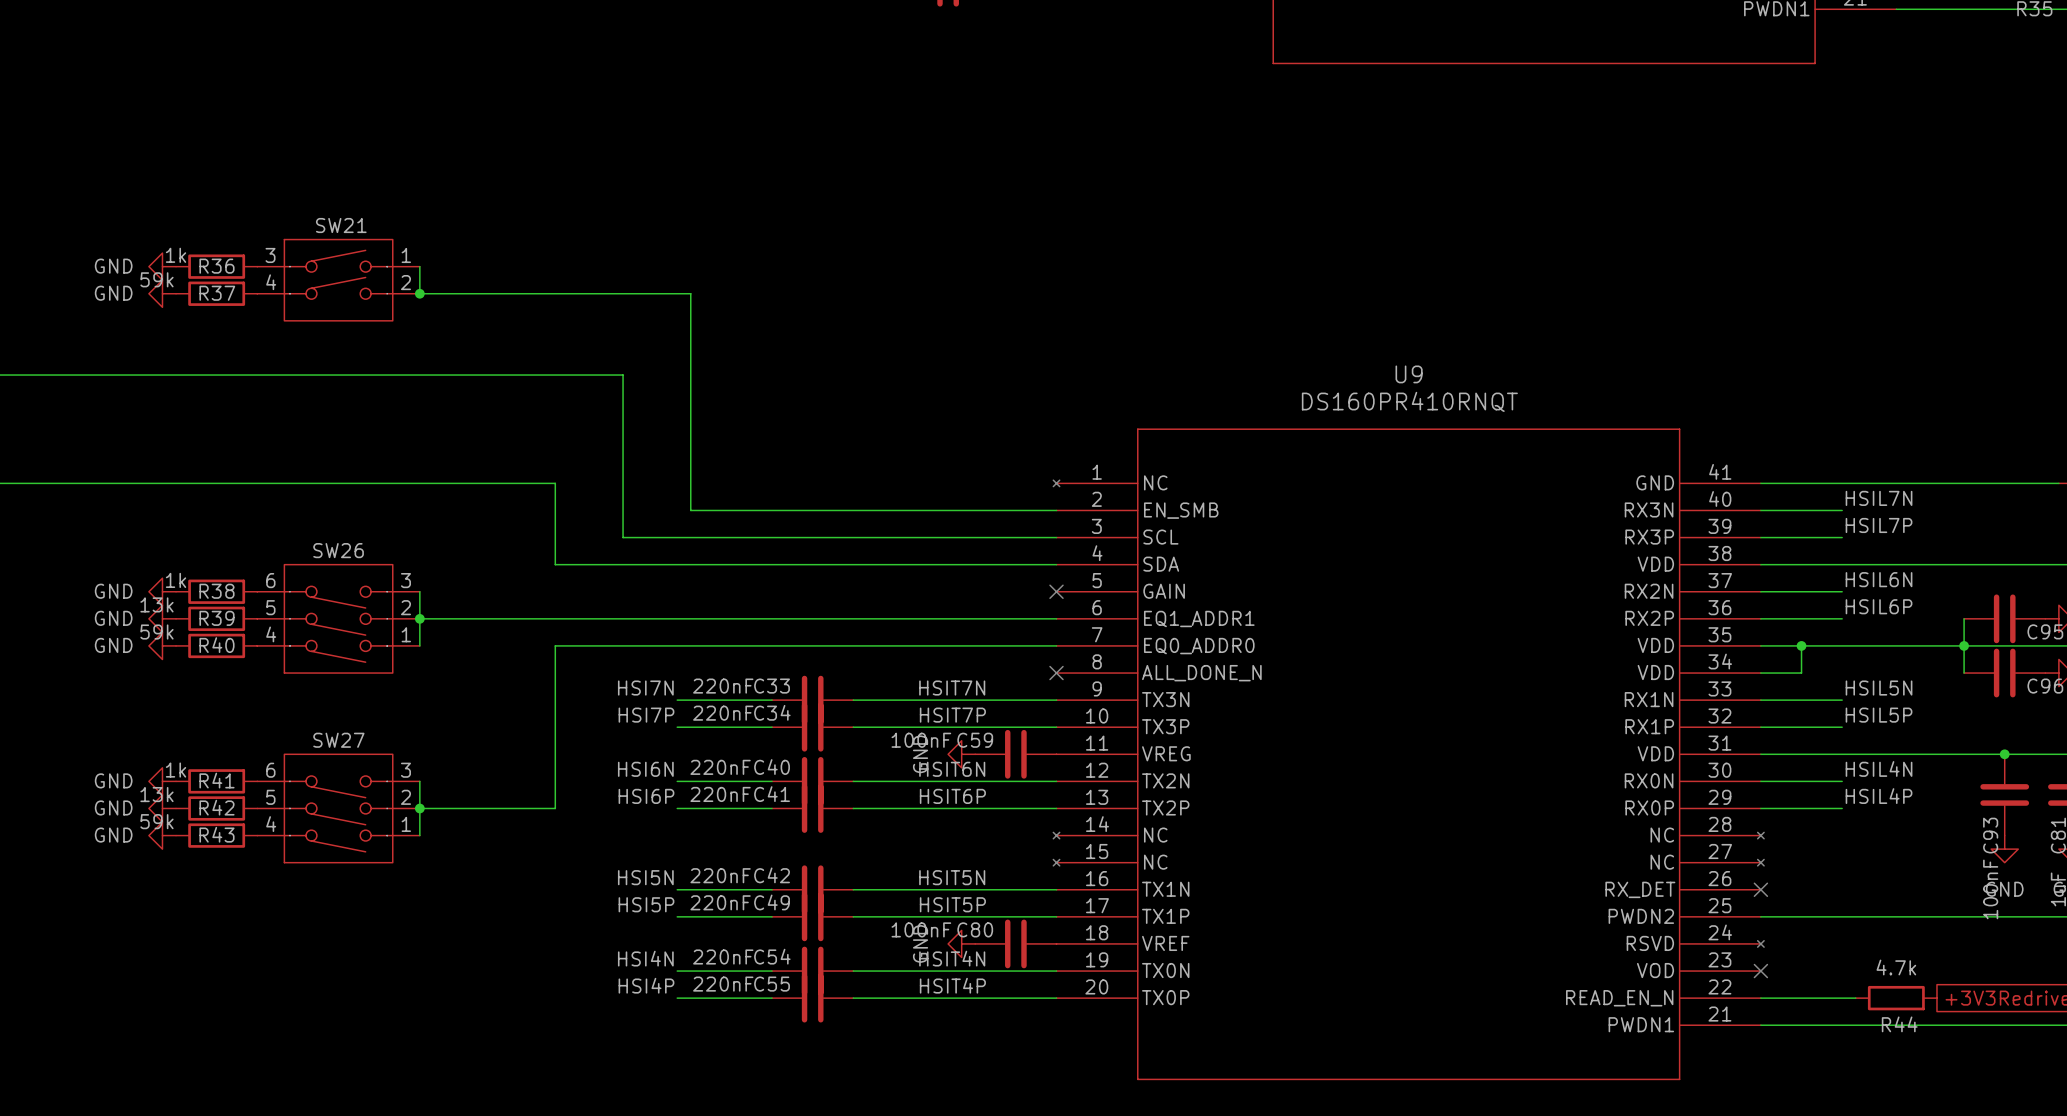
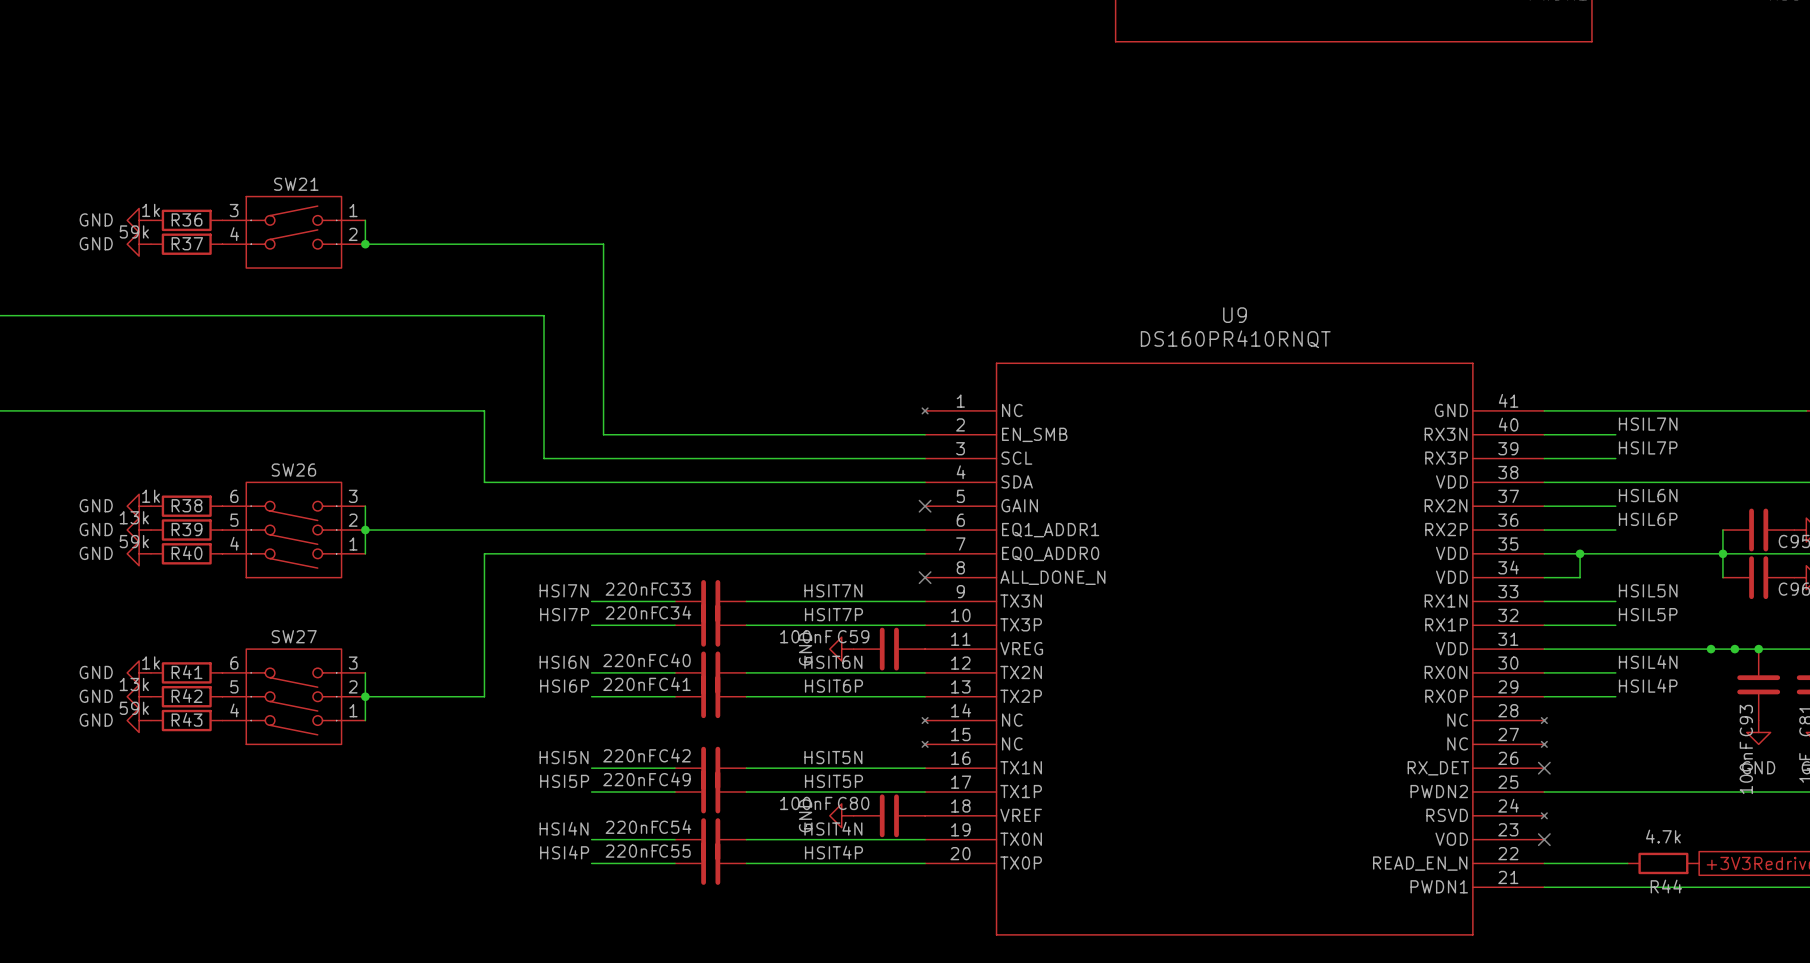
junction: none -> (1711, 649)
junction: none -> (1734, 649)

